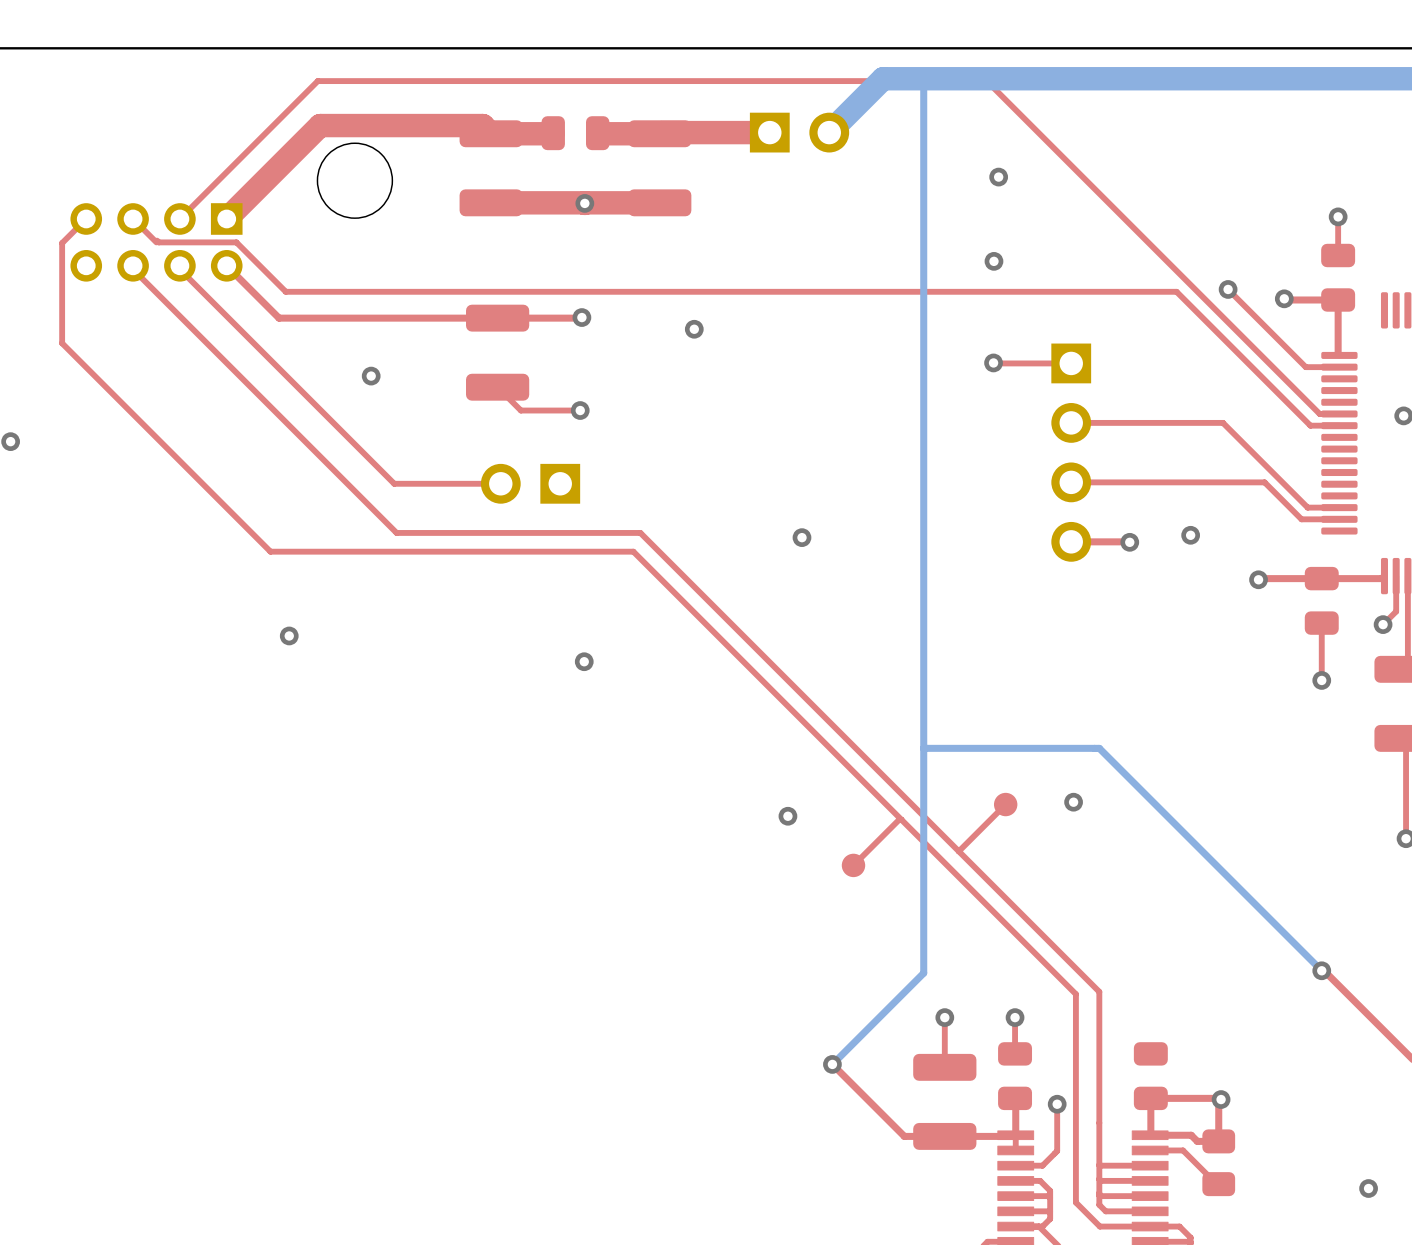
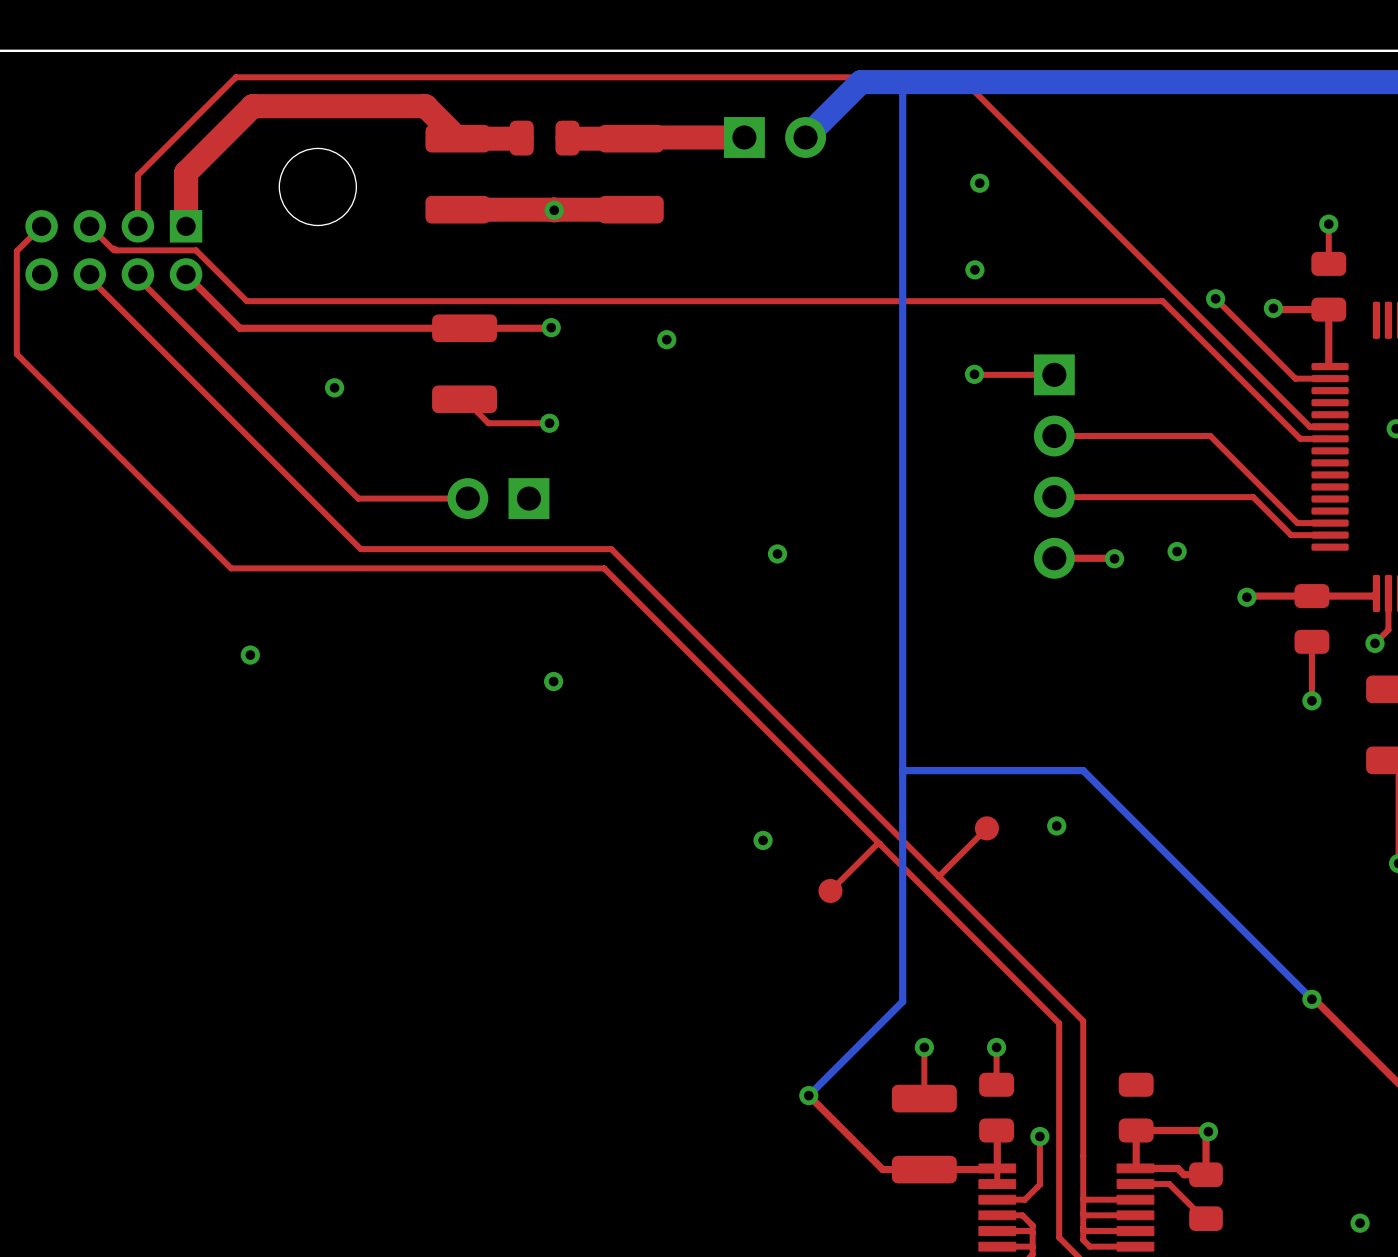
top track: (986, 81) (317, 81) (179, 218) -> (967, 84) (960, 77) (235, 77) (137, 175) (137, 226)
top track: (482, 125) (320, 125) (226, 218) -> (449, 130) (425, 106) (252, 106) (186, 172) (186, 226)

